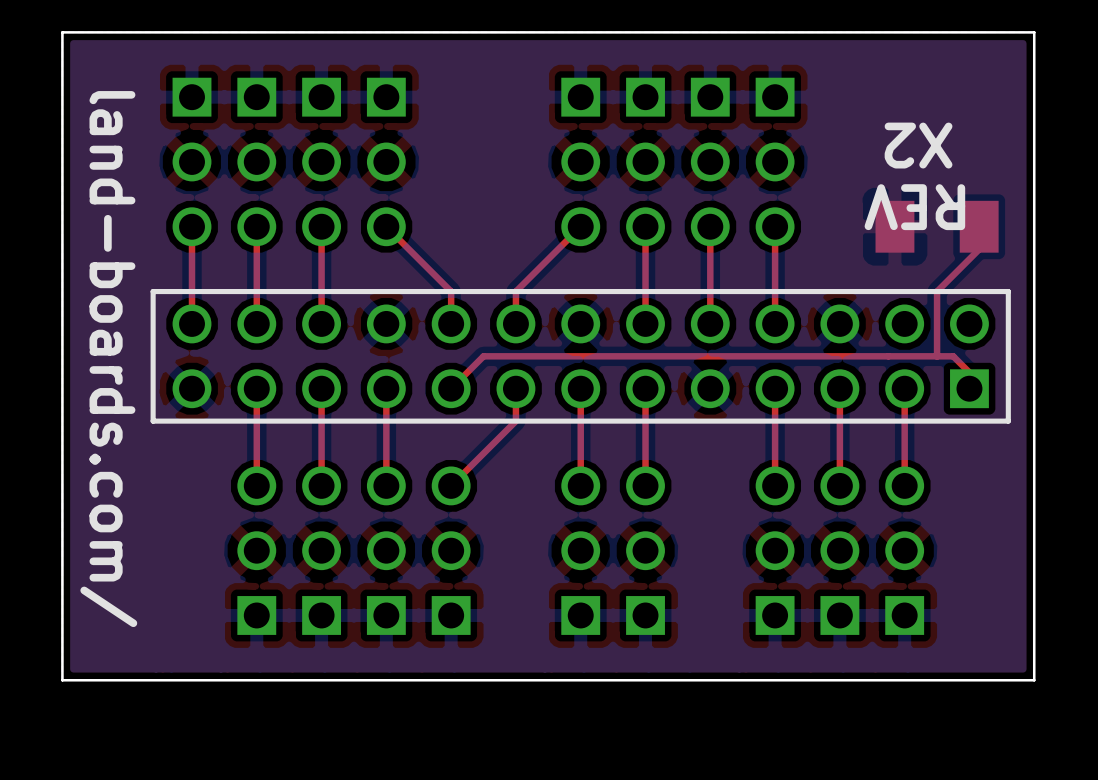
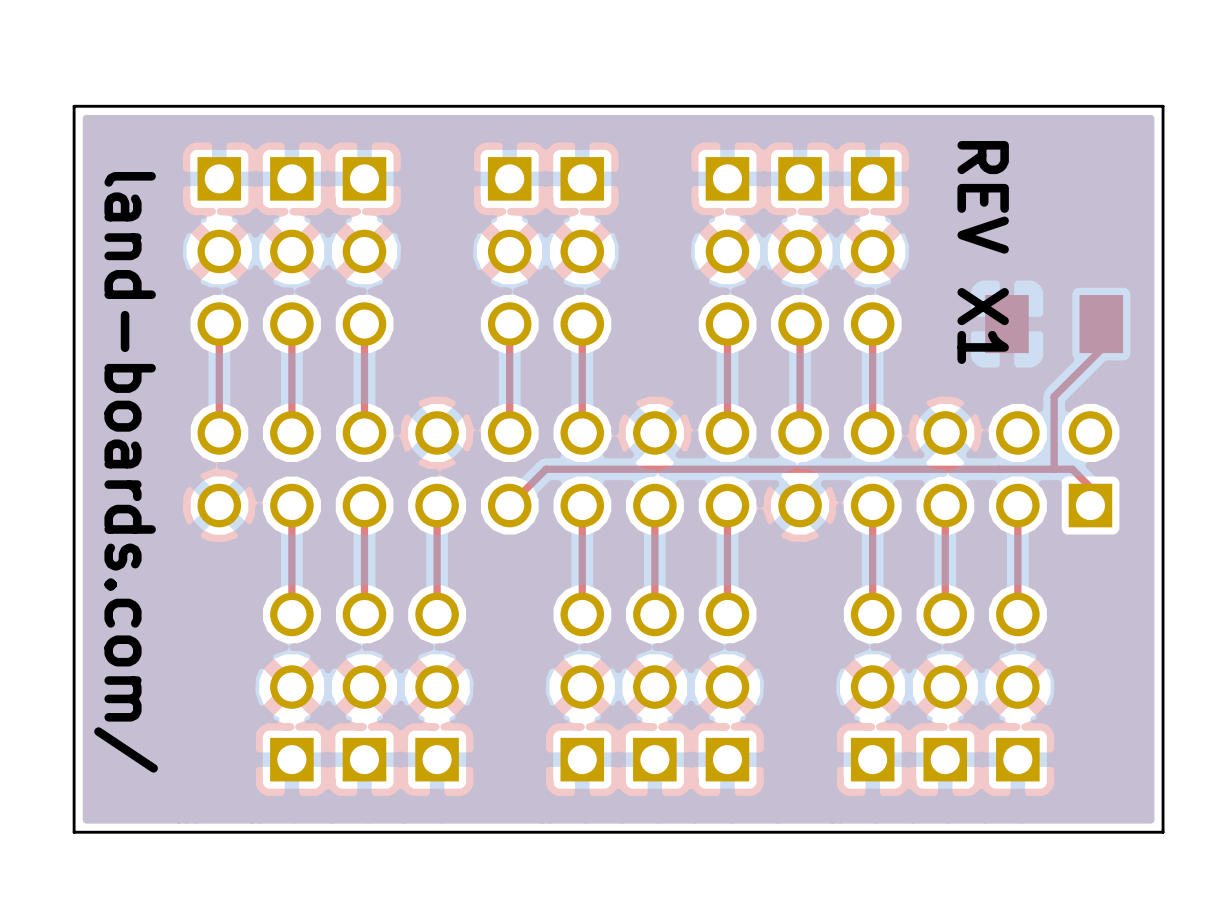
text: X2 (918, 145) -> none
part: (386, 161) -> none
part: none -> (509, 251)
part: none -> (582, 251)
part: (580, 161) -> none
text: REV (914, 207) -> REV X1 (983, 252)
top track: (386, 226) (451, 291) -> (509, 324) (509, 396)
top track: (580, 226) (515, 291) -> (582, 324) (582, 396)
line: (1008, 291) (1008, 421) (153, 421) (153, 291) (1008, 291) -> none
top track: (515, 421) (451, 485) -> (582, 541) (582, 614)
part position: (451, 550) -> (582, 687)

